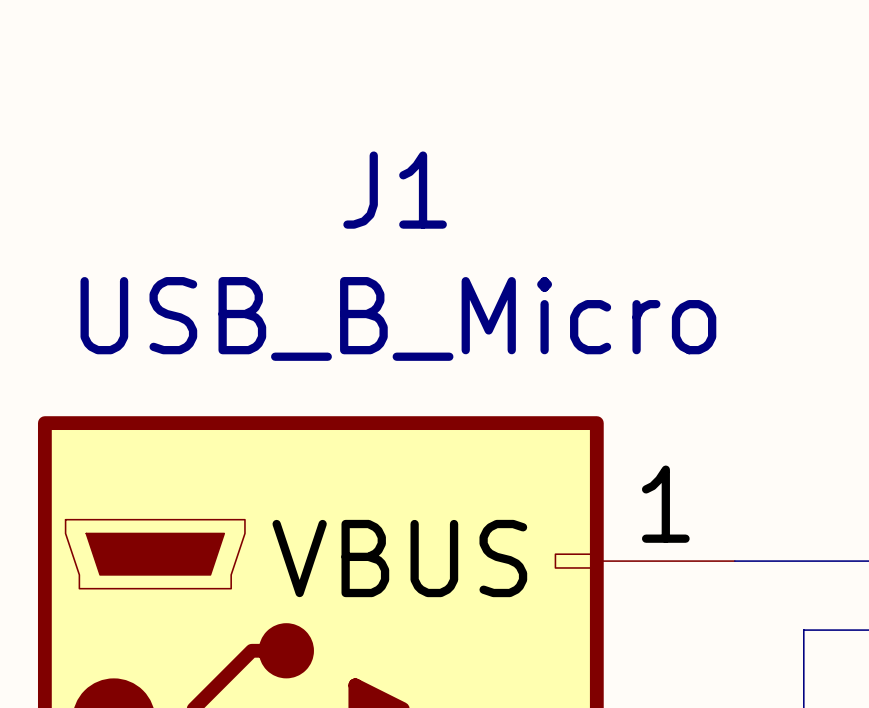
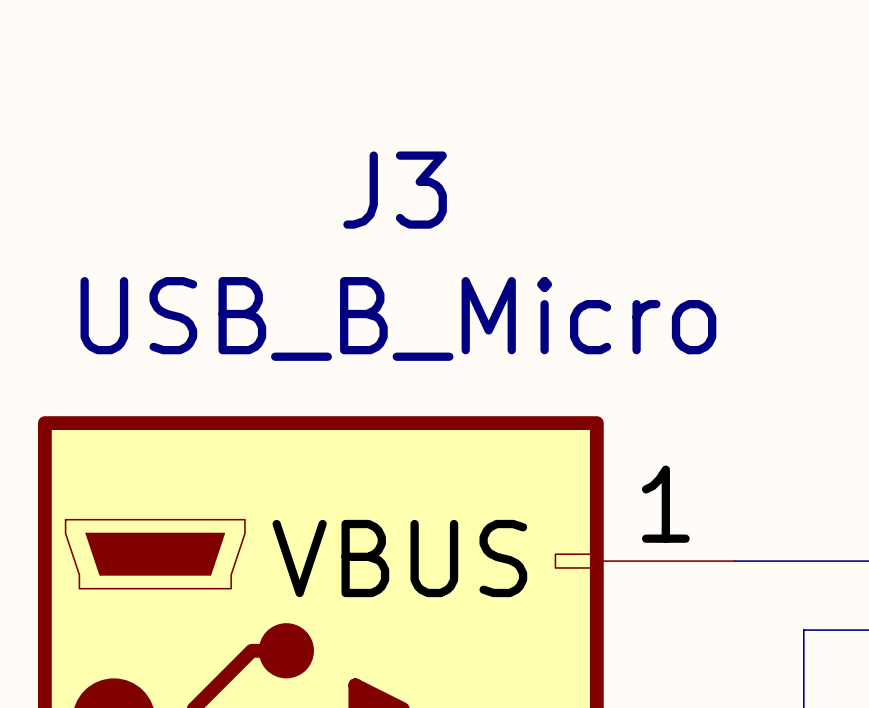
J1 name: J1 (395, 190) -> J3 (395, 190)

